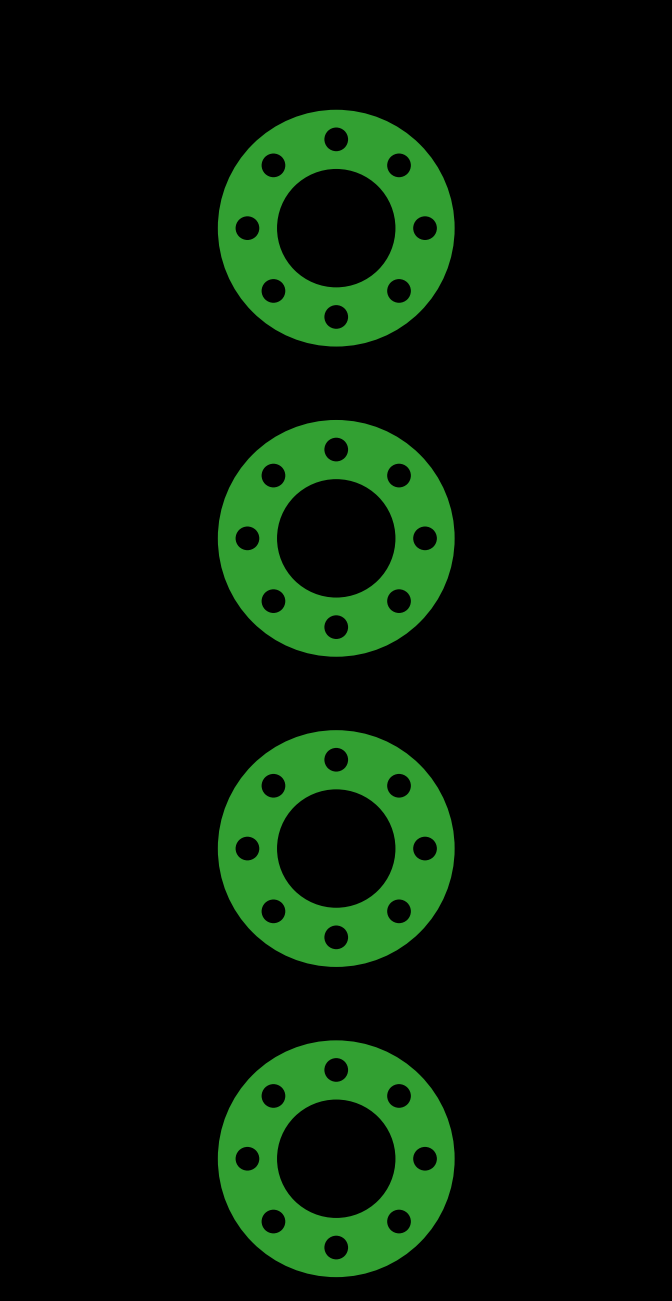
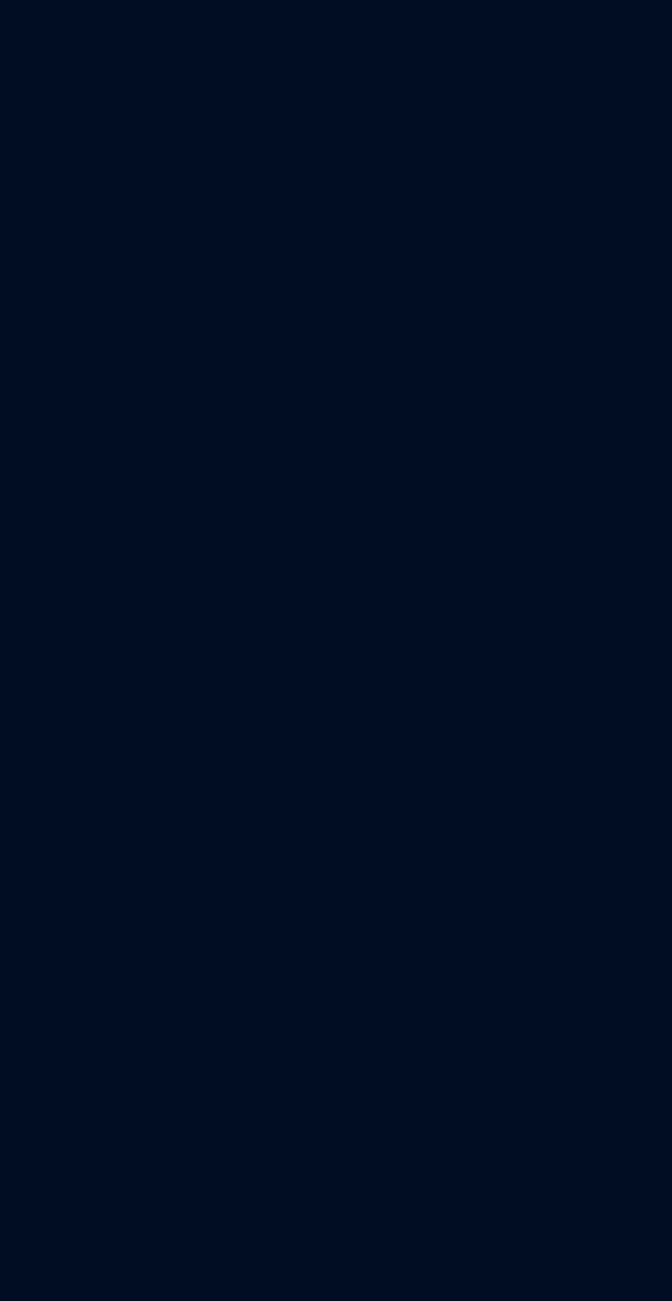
part: (336, 228) -> none
part: (336, 538) -> none
part: (336, 848) -> none
part: (336, 1158) -> none

